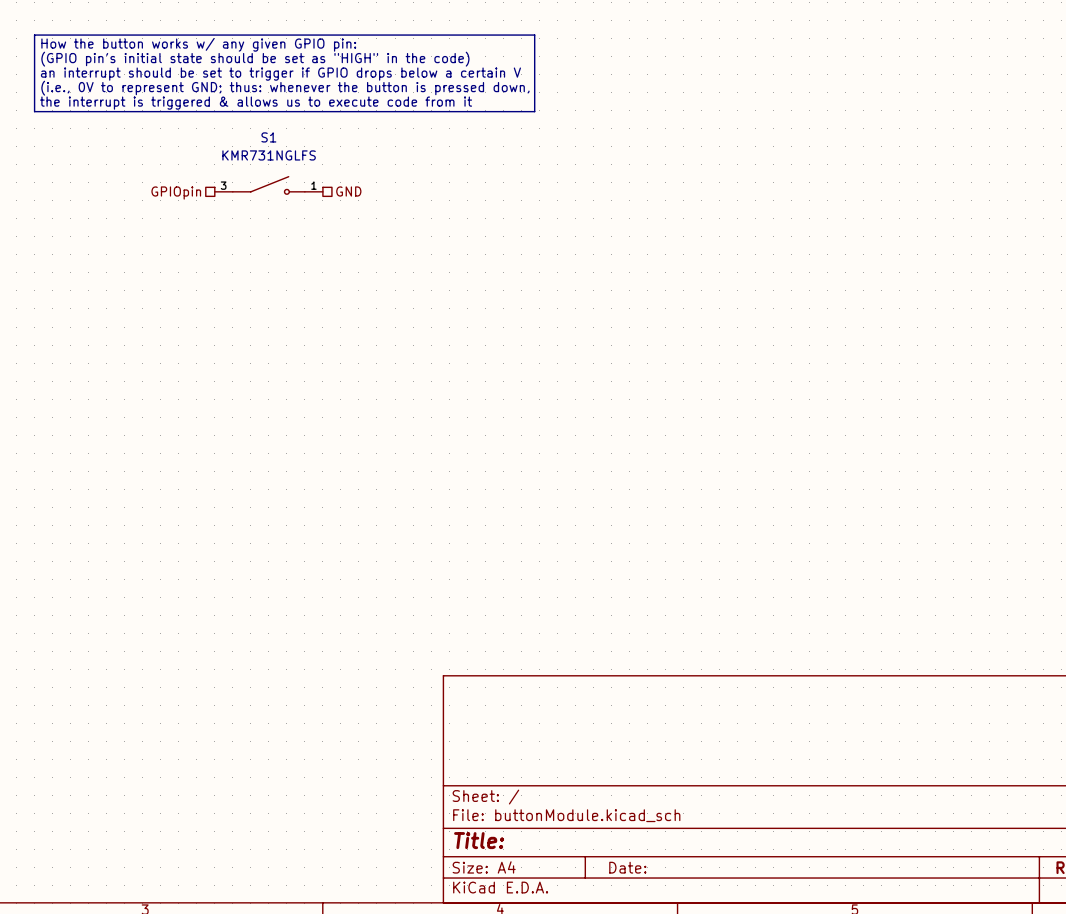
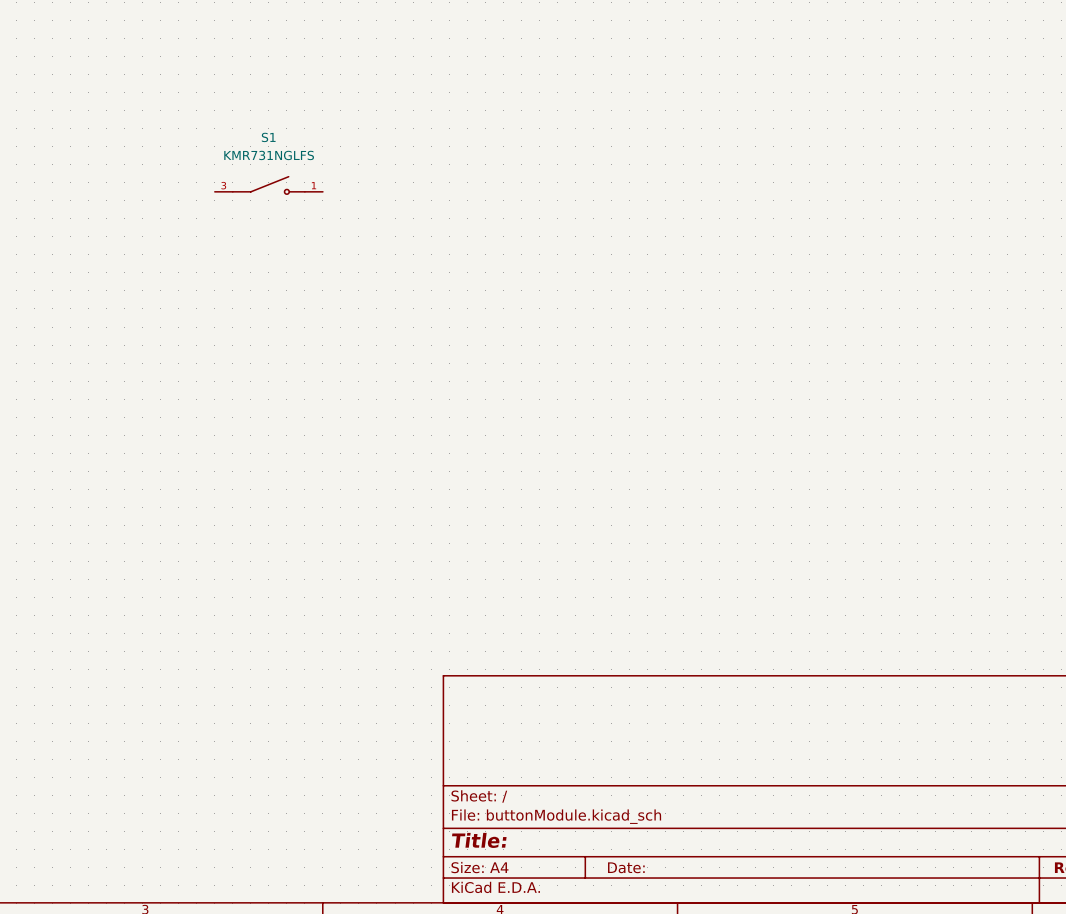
line: (34, 35) (534, 35) (534, 111) (34, 111) (34, 35) -> none
text: How the button works w/ any given GPIO pin: (198, 44) -> none
text: (GPIO pin's initial state should be set as "HIGH" in the code) (255, 59) -> none
text: an interrupt should be set to trigger if GPIO drops below a certain V (280, 74) -> none
text: (i.e., 0V to represent GND; thus: whenever the button is pressed down, (285, 88) -> none
text: the interrupt is triggered & allows us to execute code from it (256, 103) -> none
hierarchical label: GND (348, 191) -> none
hierarchical label: GPIOpin (176, 193) -> none

